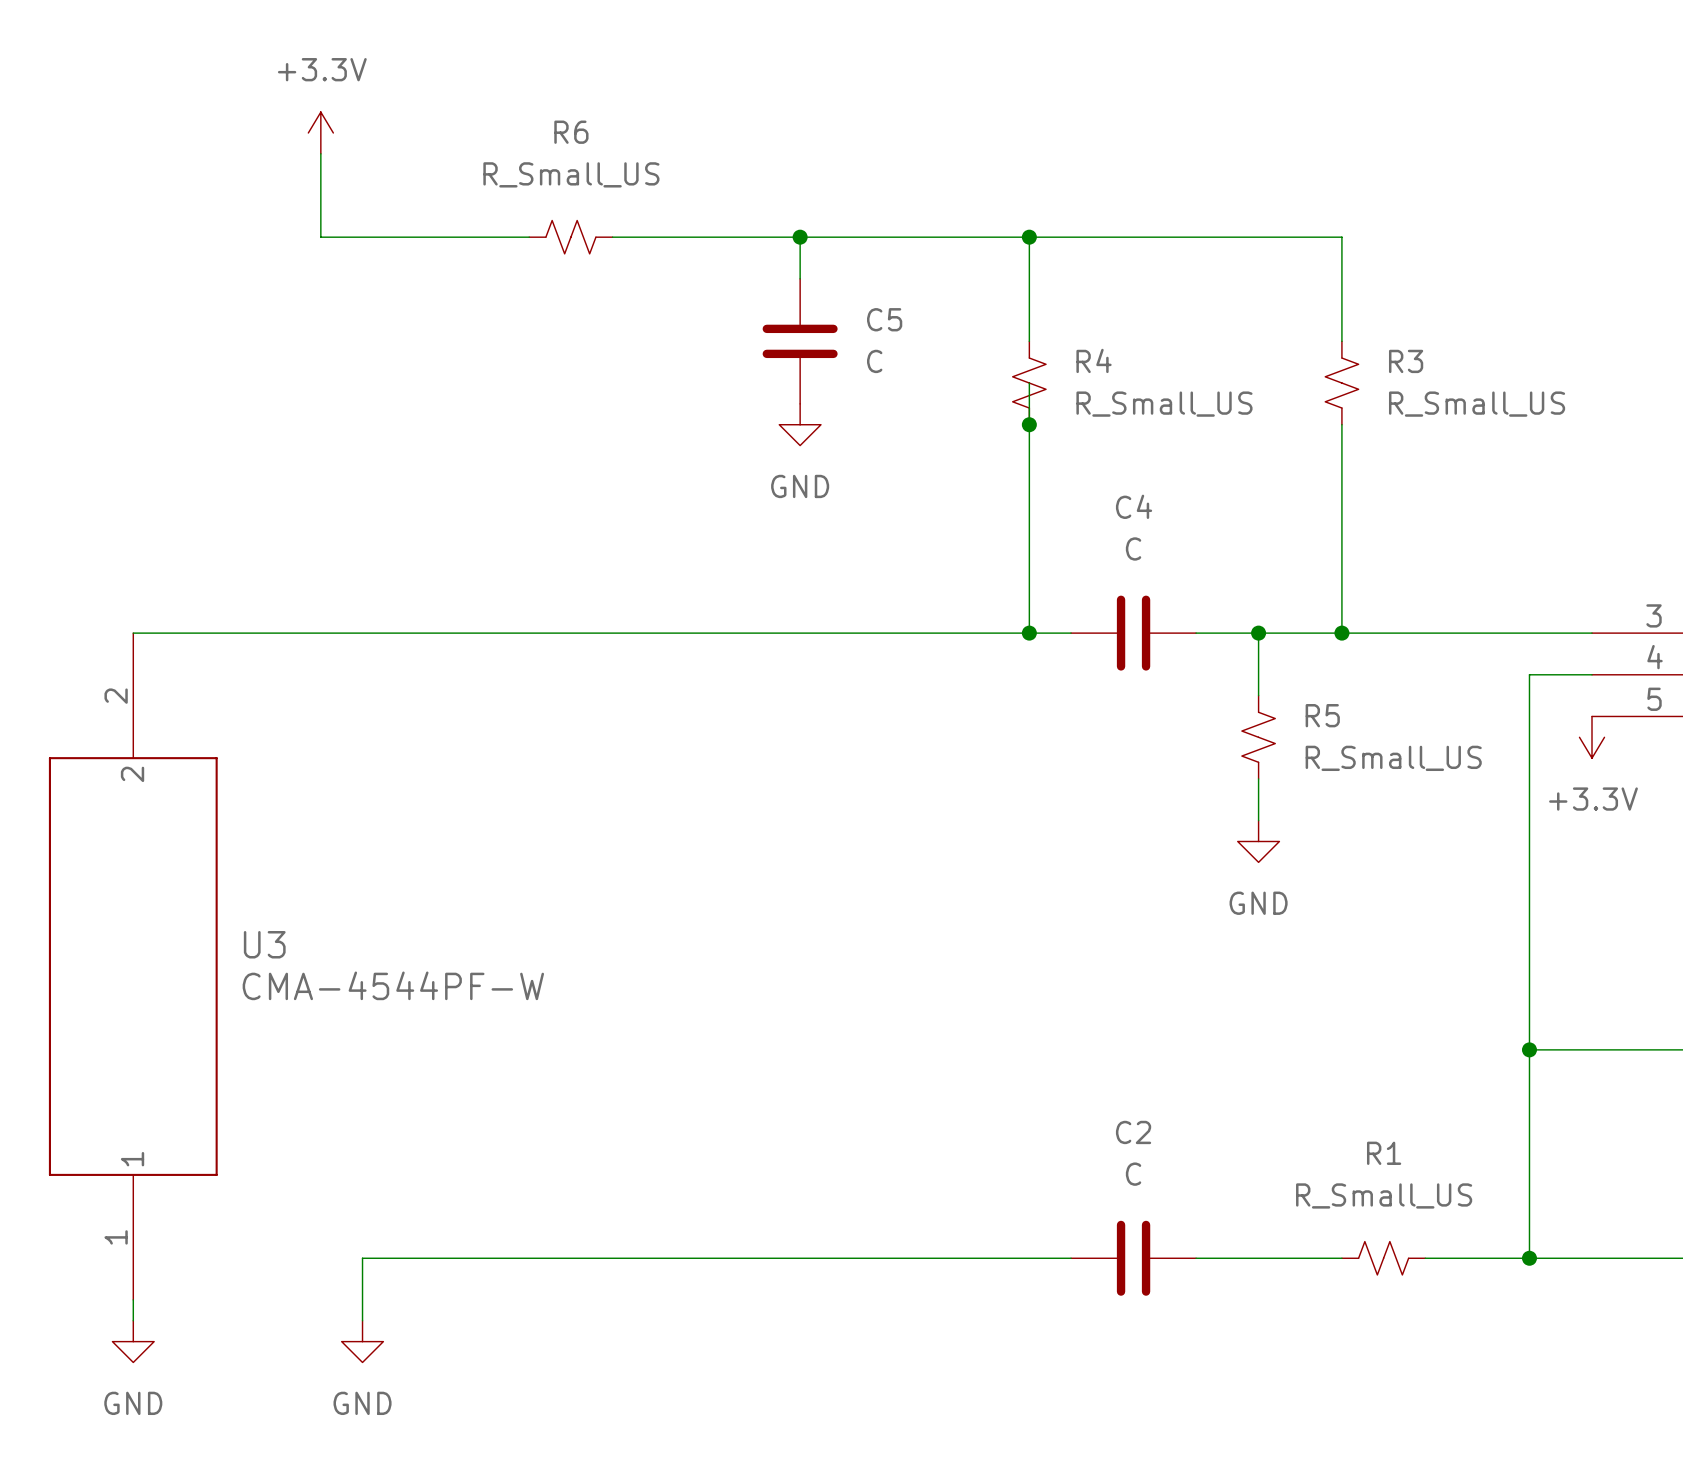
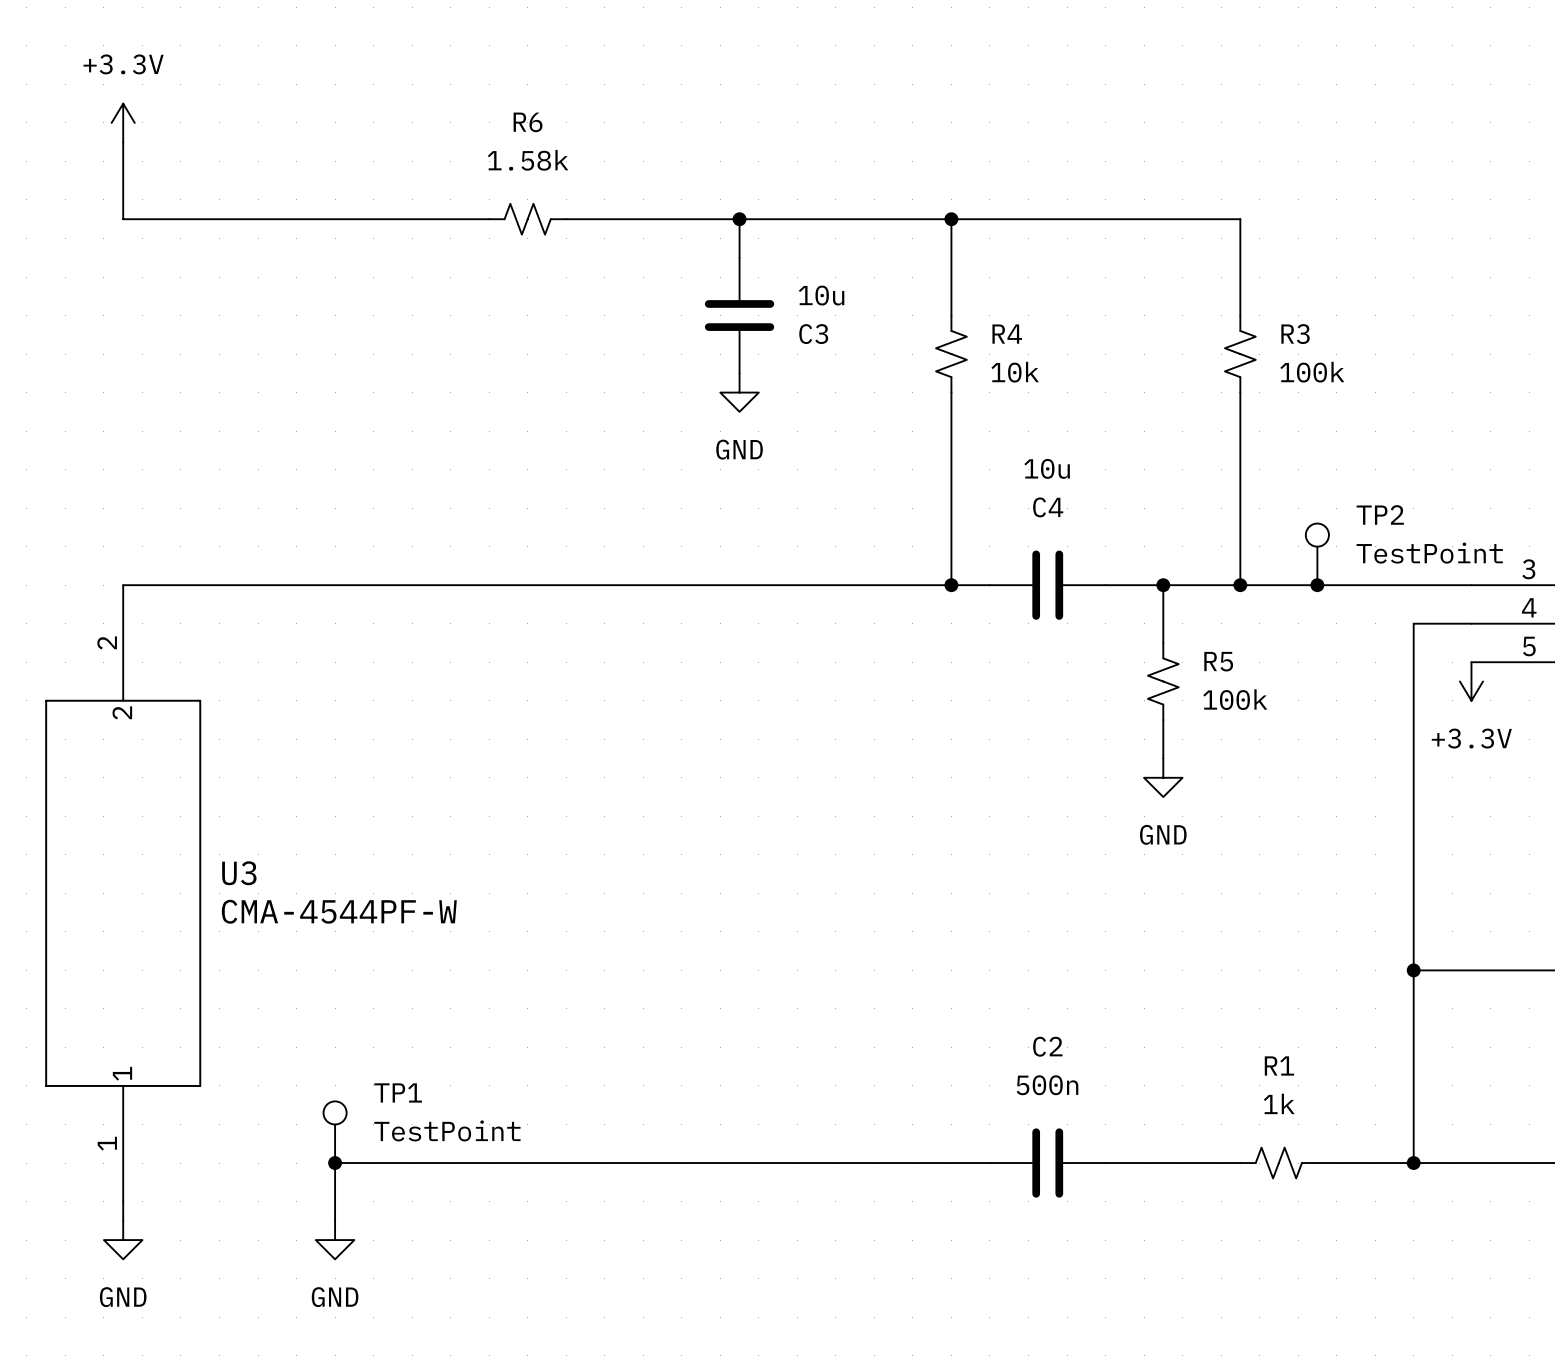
power symbol position: +3.3V (320, 132) -> +3.3V (123, 122)
wire: (320, 153) (320, 237) -> (123, 142) (123, 219) (296, 219)
R6 value: R_Small_US (571, 174) -> 1.58k (528, 160)
C5 name: C5 (884, 319) -> 10u (821, 295)
C5 value: C (874, 361) -> C3 (813, 334)
wire: (1029, 383) (1029, 424) -> none
R4 value: R_Small_US (1164, 404) -> 10k (1015, 372)
R3 value: R_Small_US (1477, 404) -> 100k (1312, 372)
junction: (1029, 424) -> none
C4 name: C4 (1134, 506) -> 10u (1047, 468)
C4 value: C (1133, 548) -> C4 (1048, 507)
TP2: none -> TestPoint (1317, 554)
junction: none -> (1317, 585)
R5 value: R_Small_US (1393, 758) -> 100k (1235, 699)
C2 value: C (1133, 1174) -> 500n (1047, 1085)
R1 value: R_Small_US (1384, 1195) -> 1k (1279, 1103)
TP1: none -> TestPoint (335, 1132)
junction: none -> (335, 1163)

